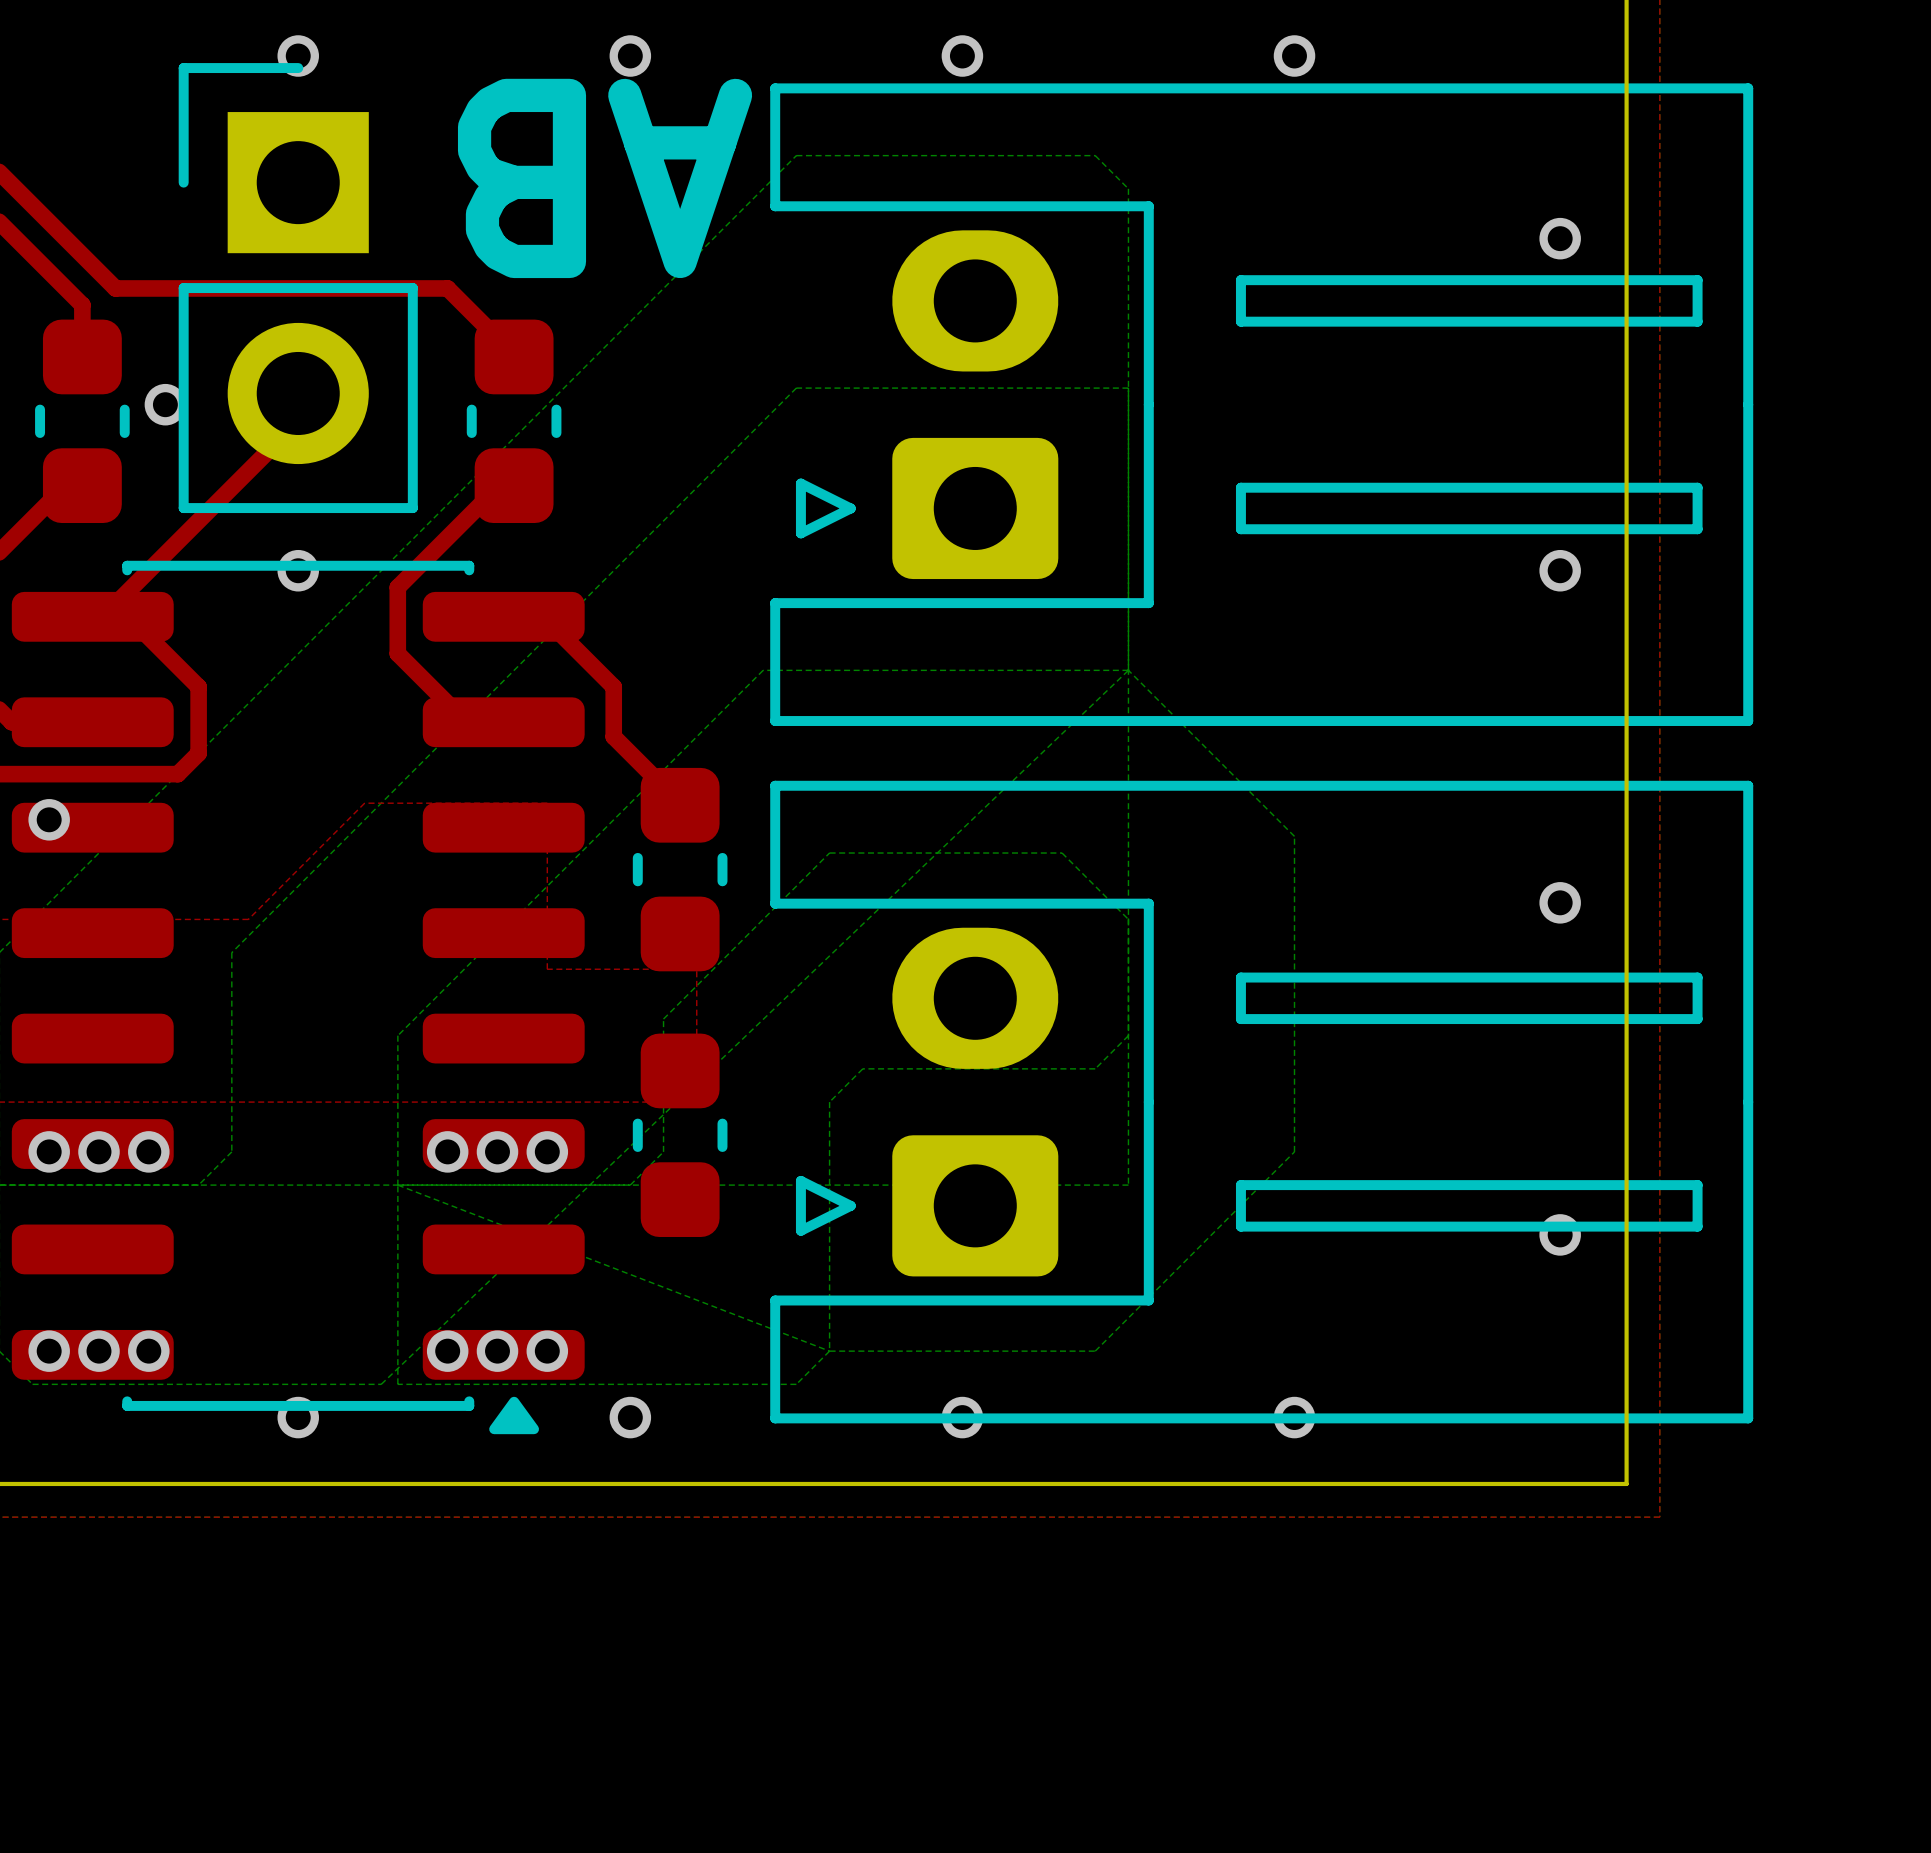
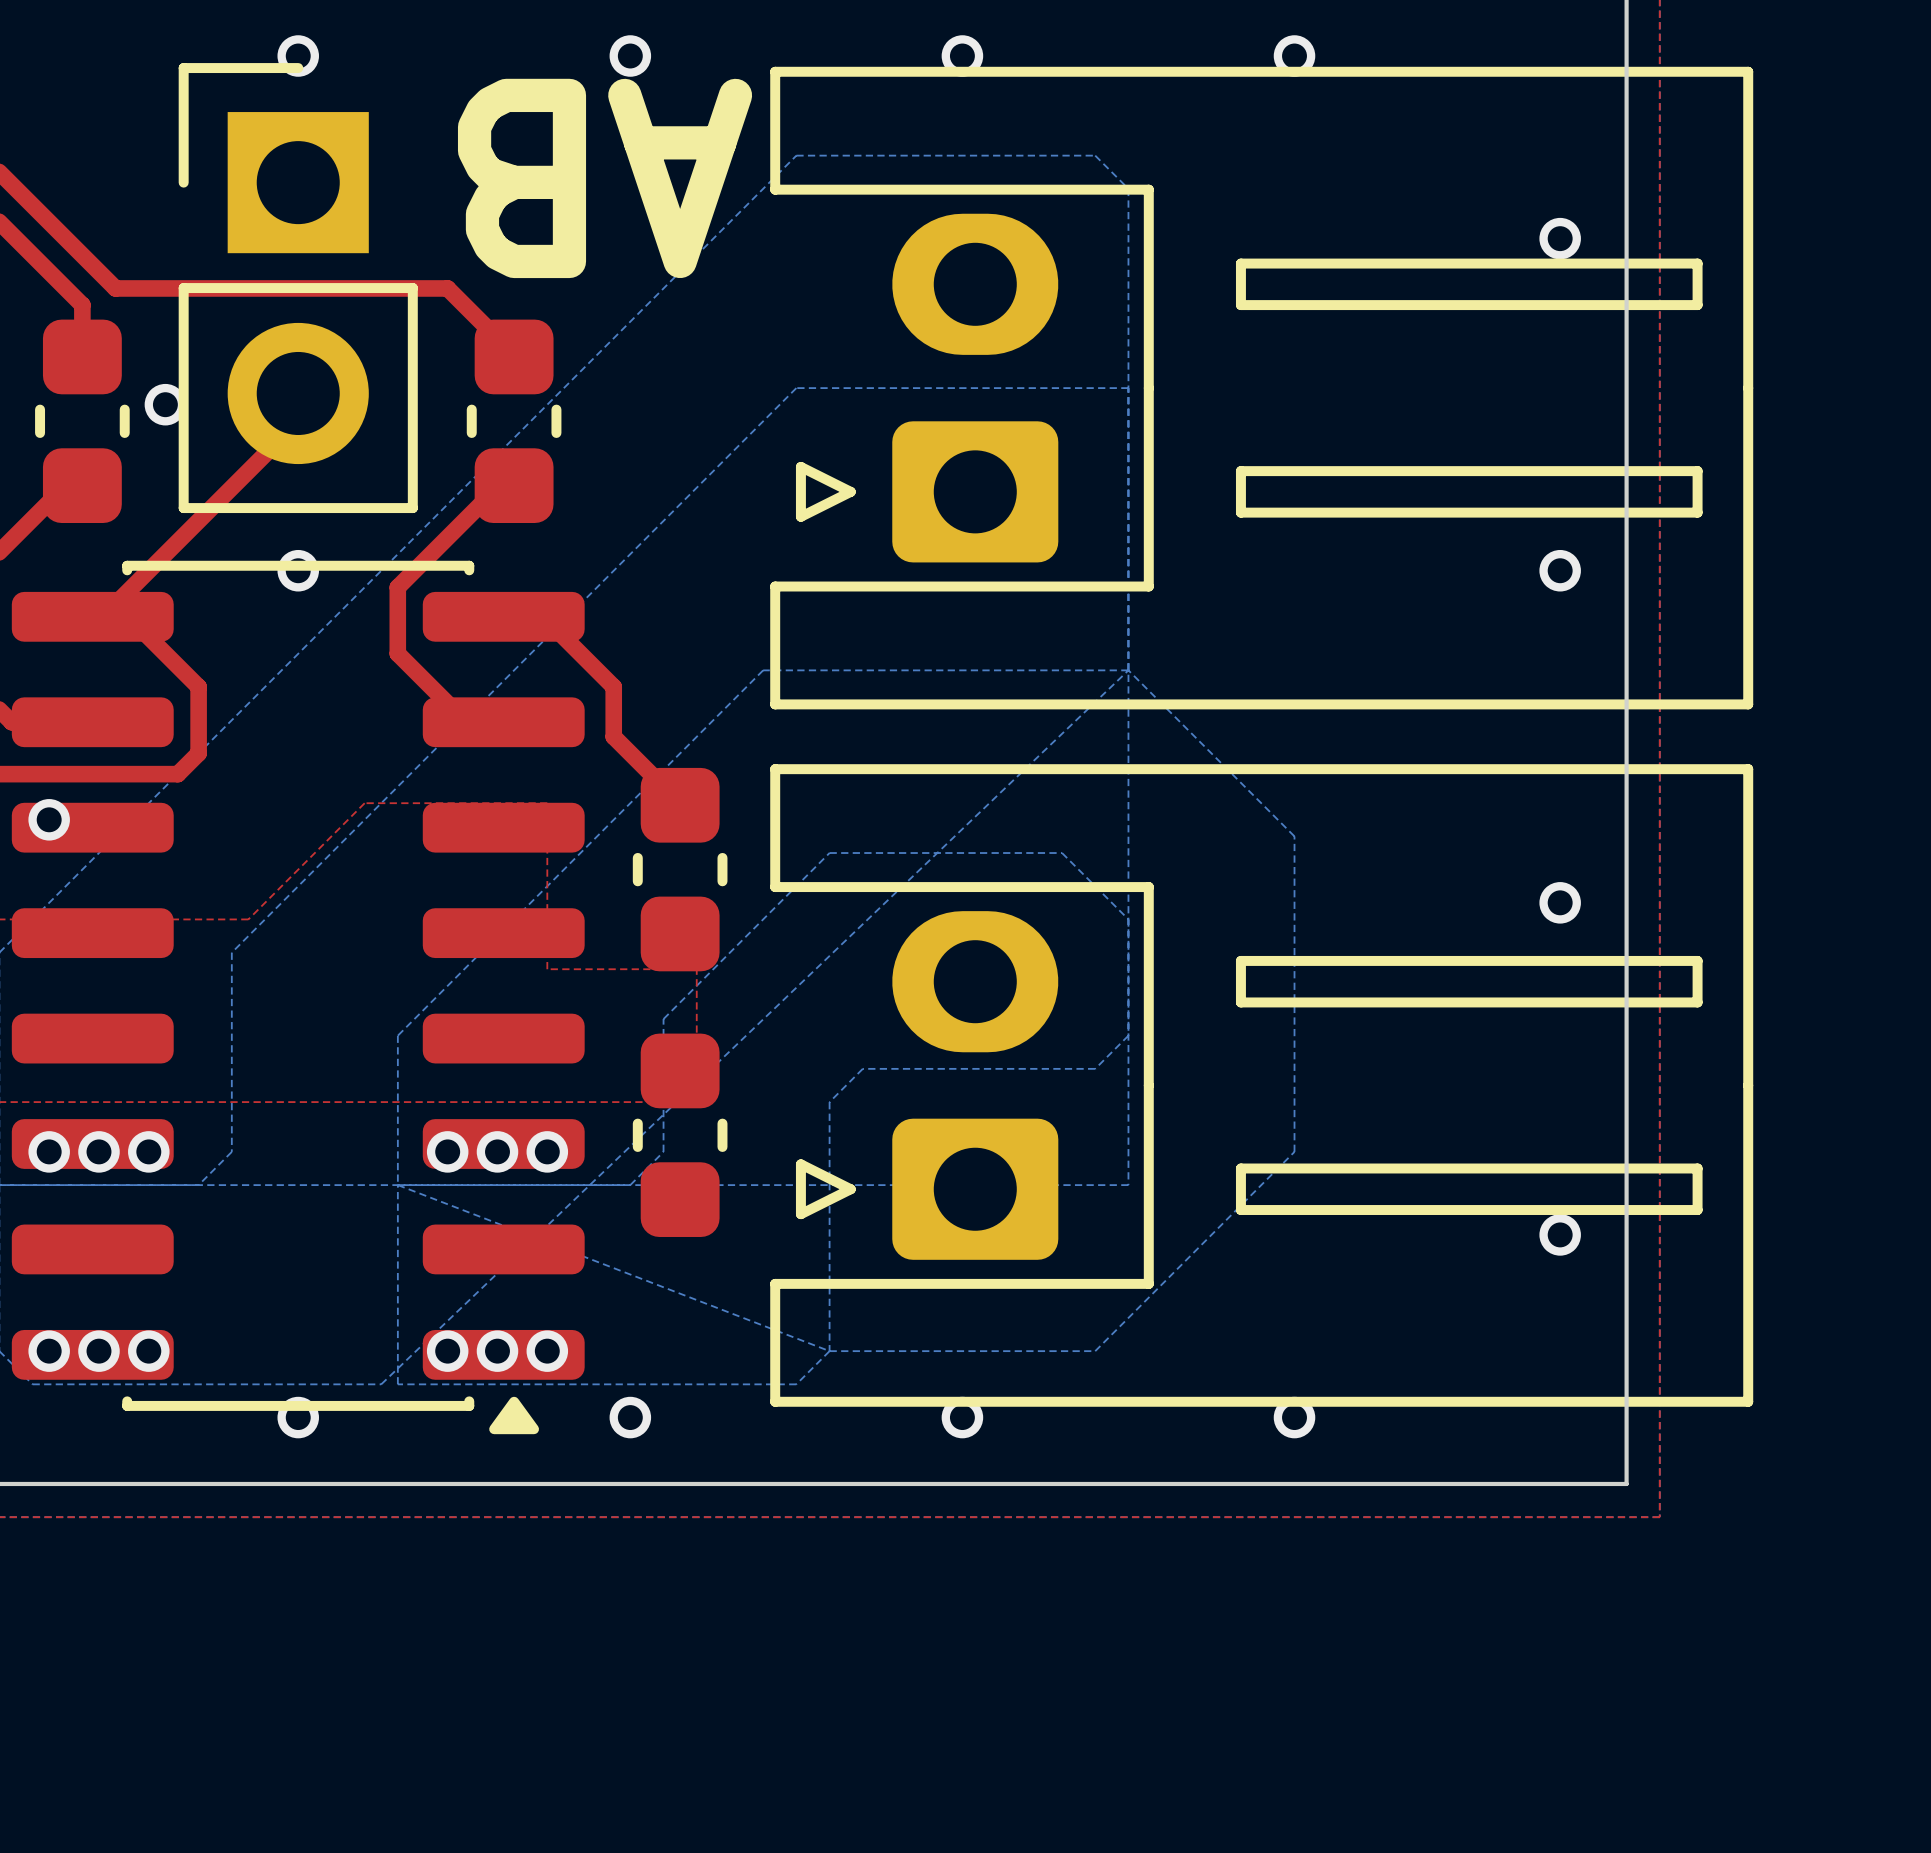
part position: (1261, 404) -> (1261, 388)
part position: (1261, 1102) -> (1261, 1085)

